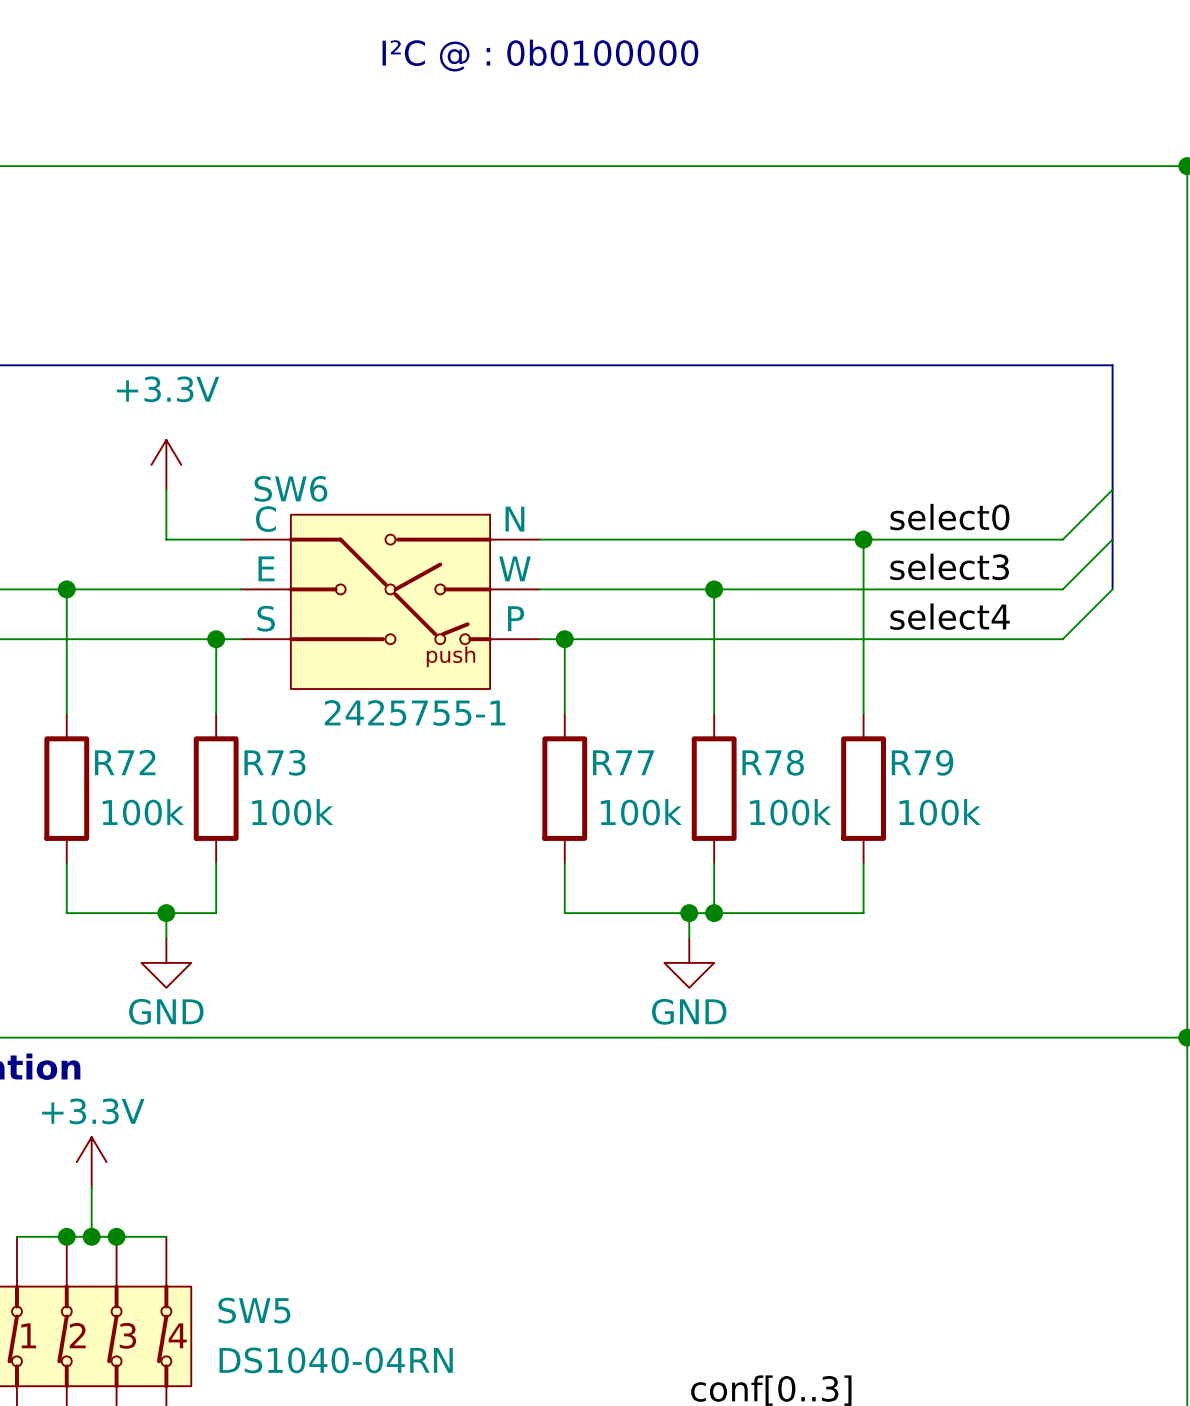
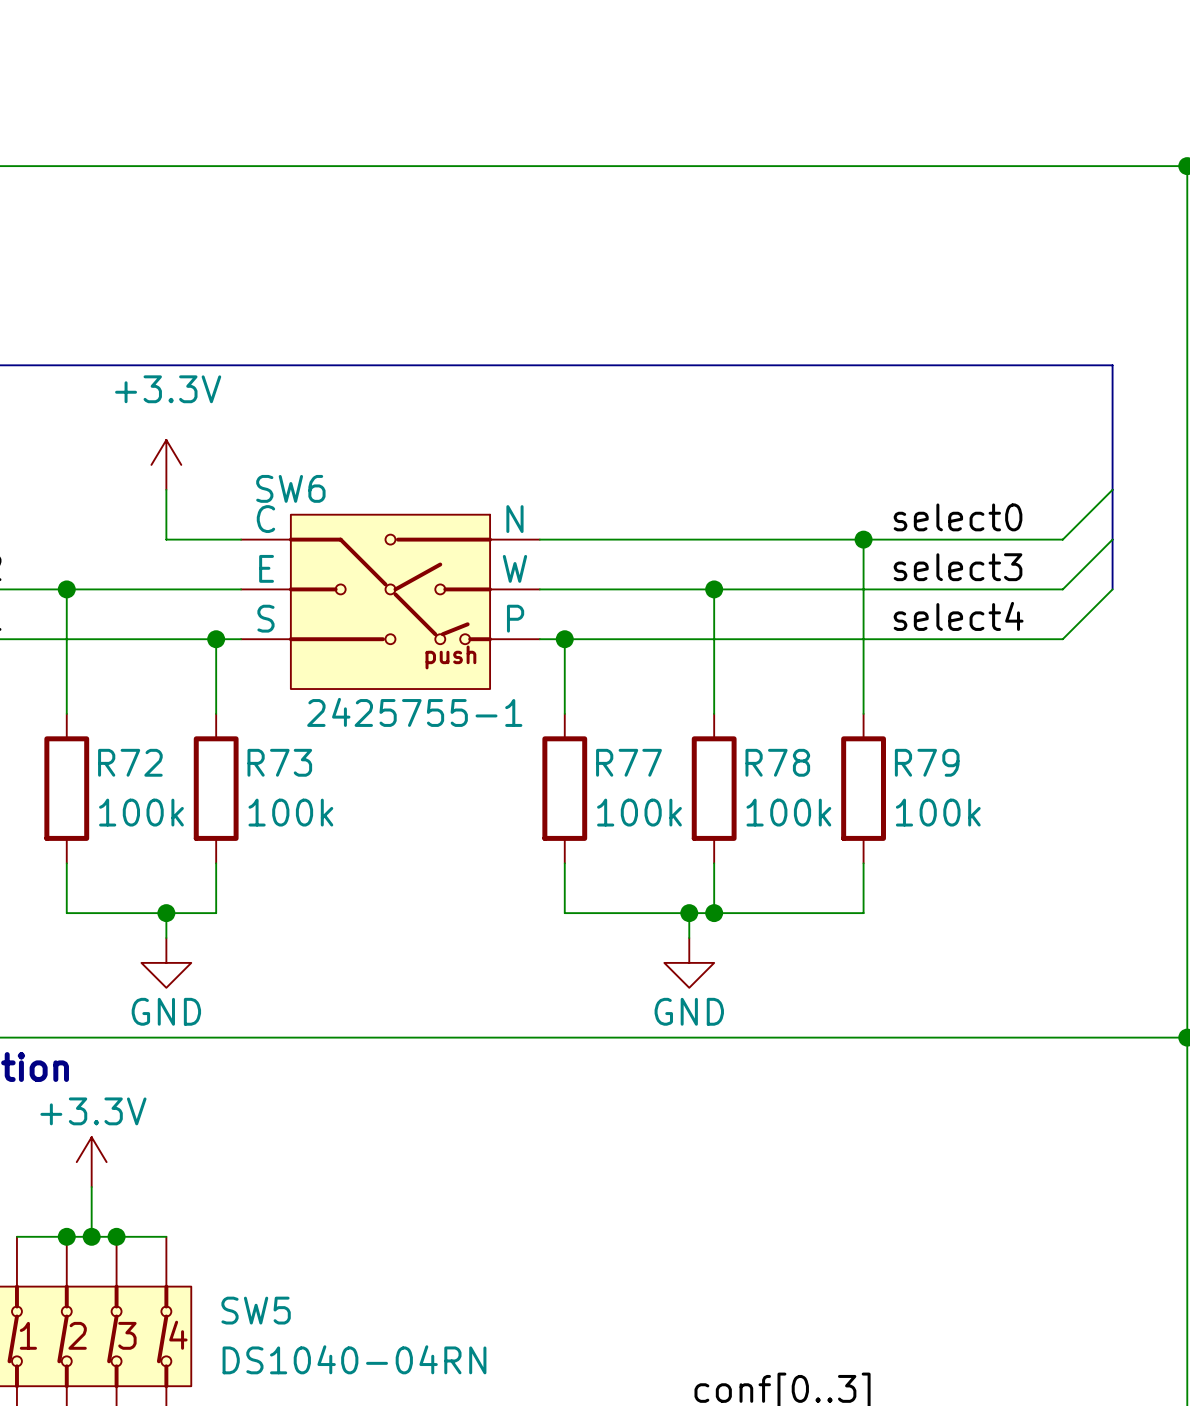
text: I²C @ : 0b0100000 (540, 55) -> none

